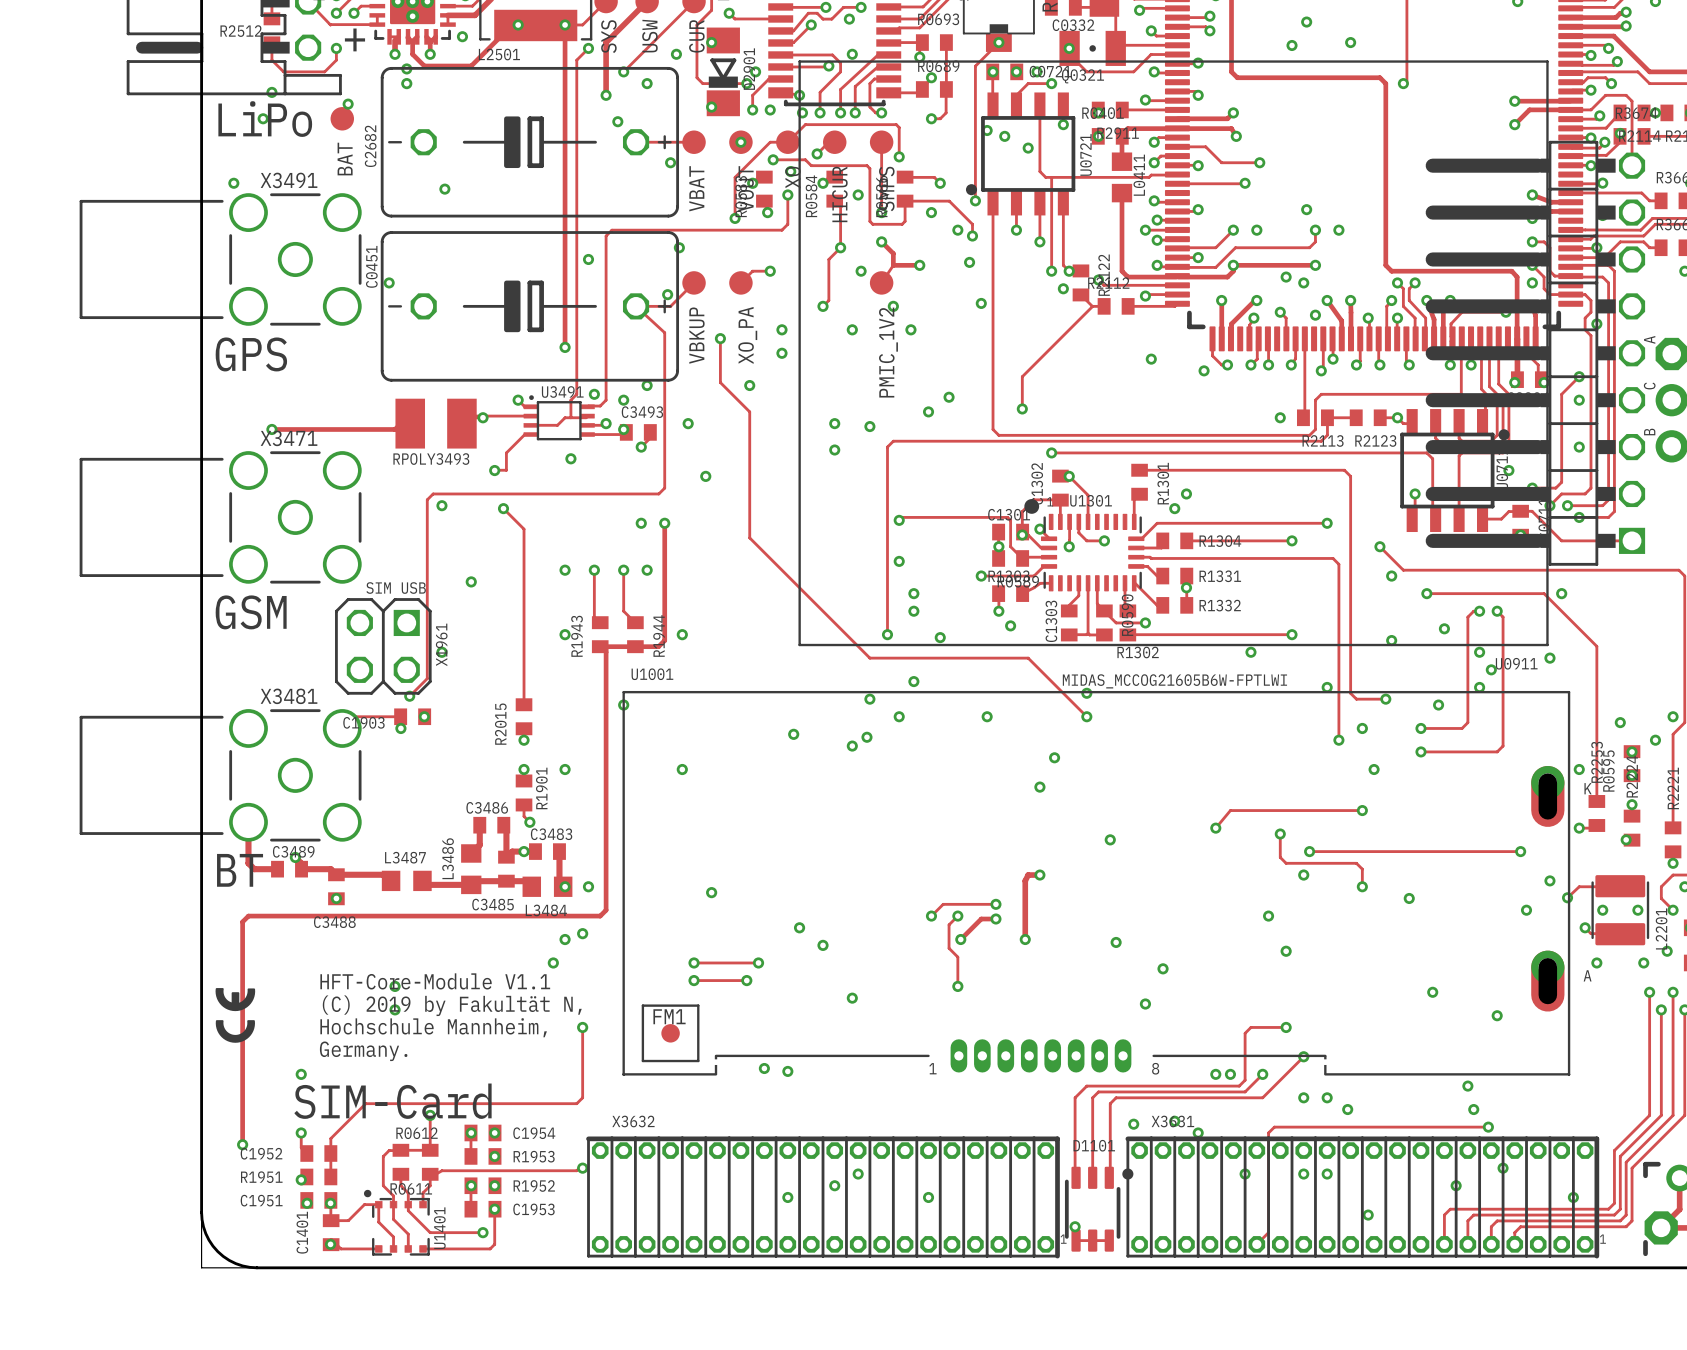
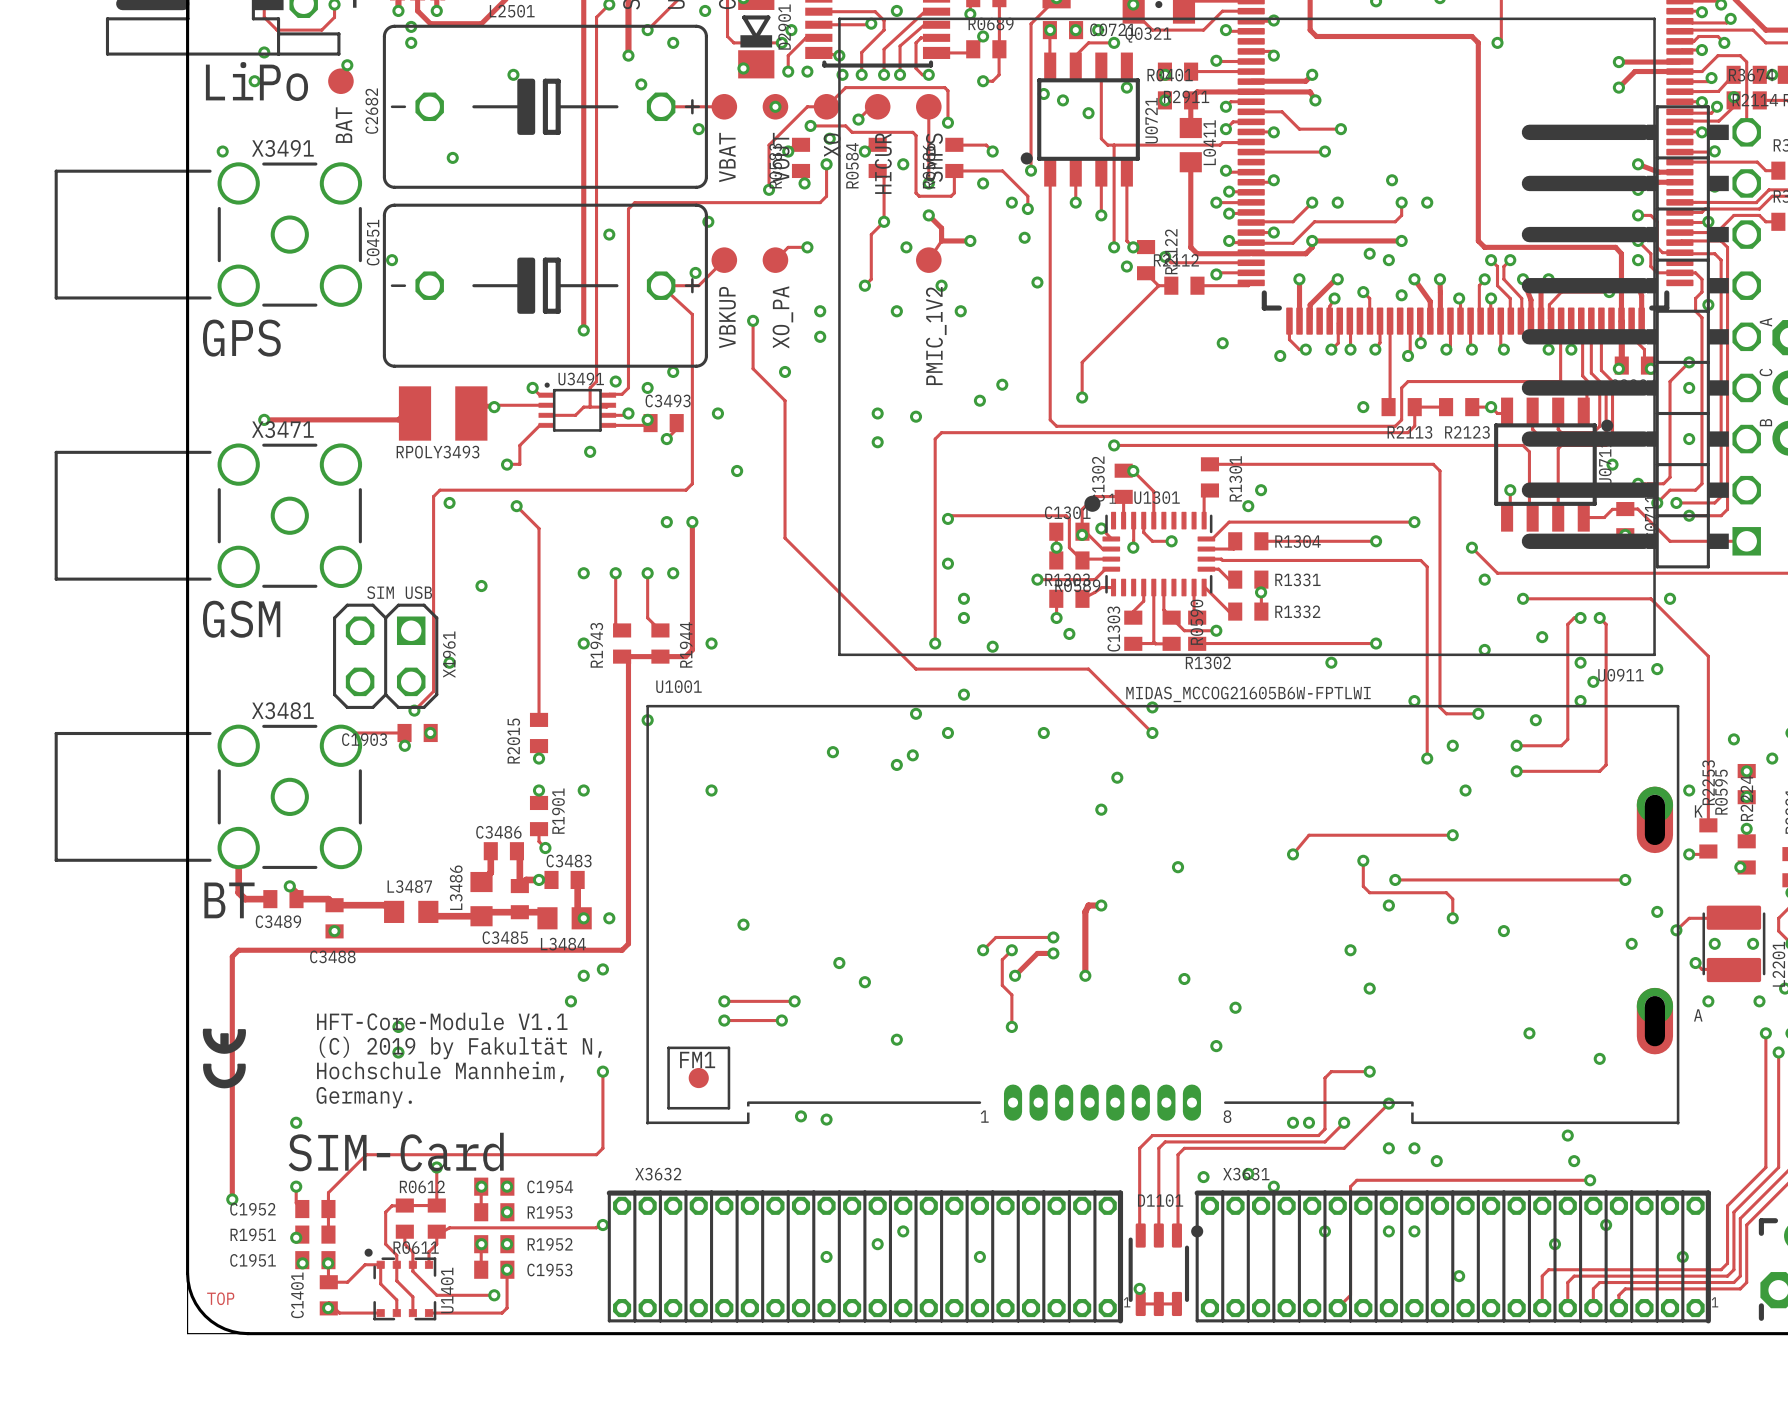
via: none -> (513, 74)
C3489 name position: C3489 (293, 851) -> C3489 (278, 921)
text: none -> TOP (220, 1298)

